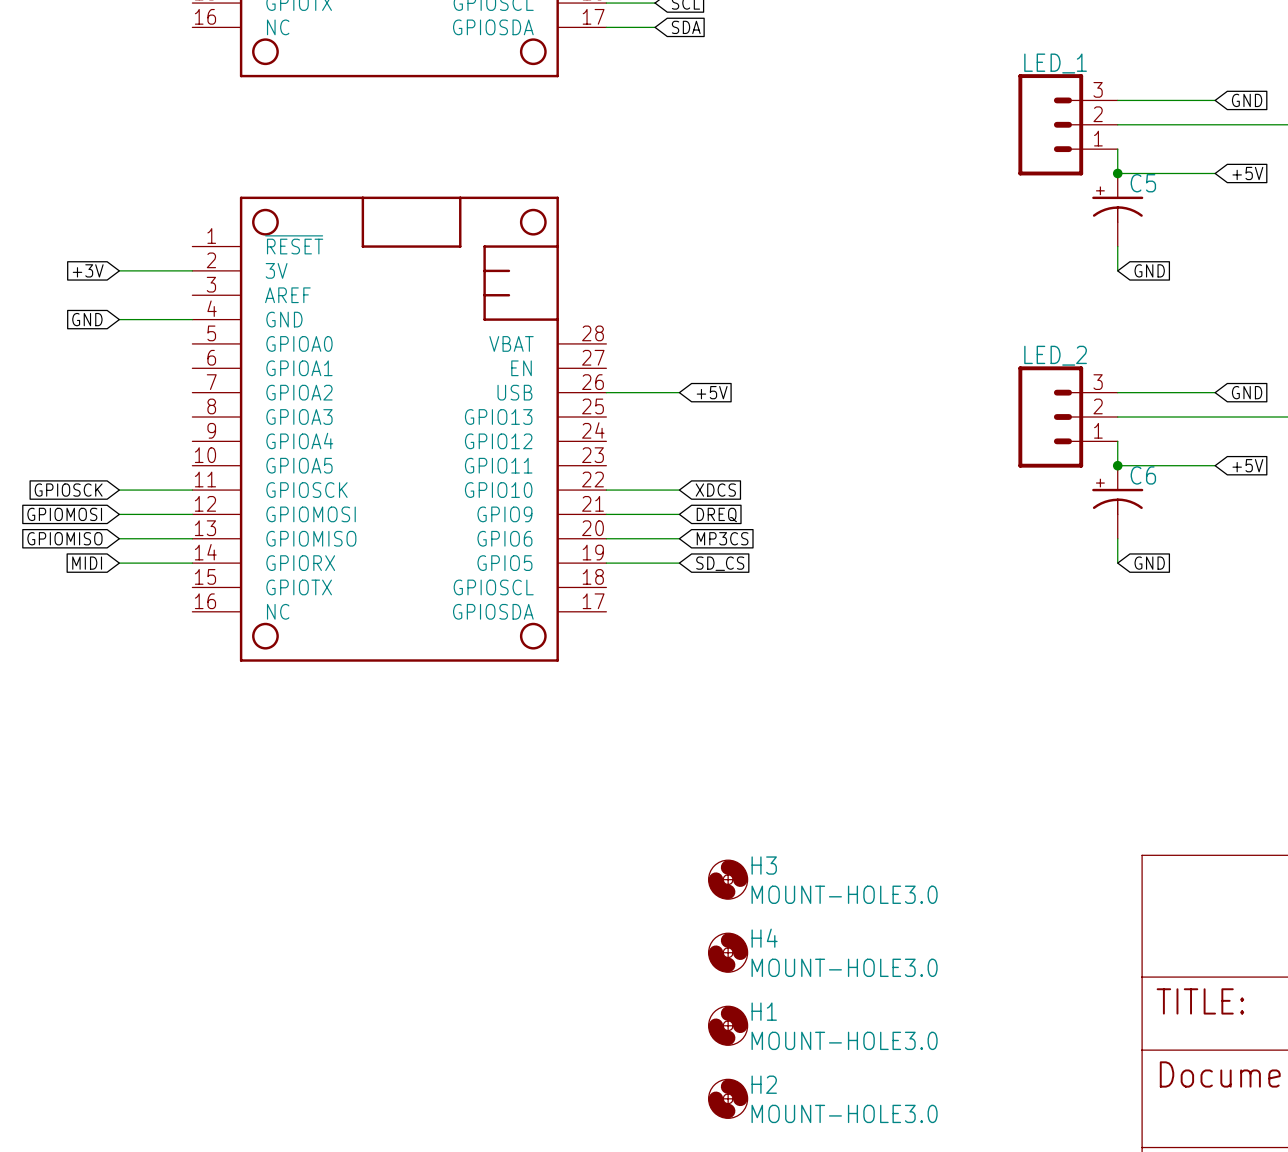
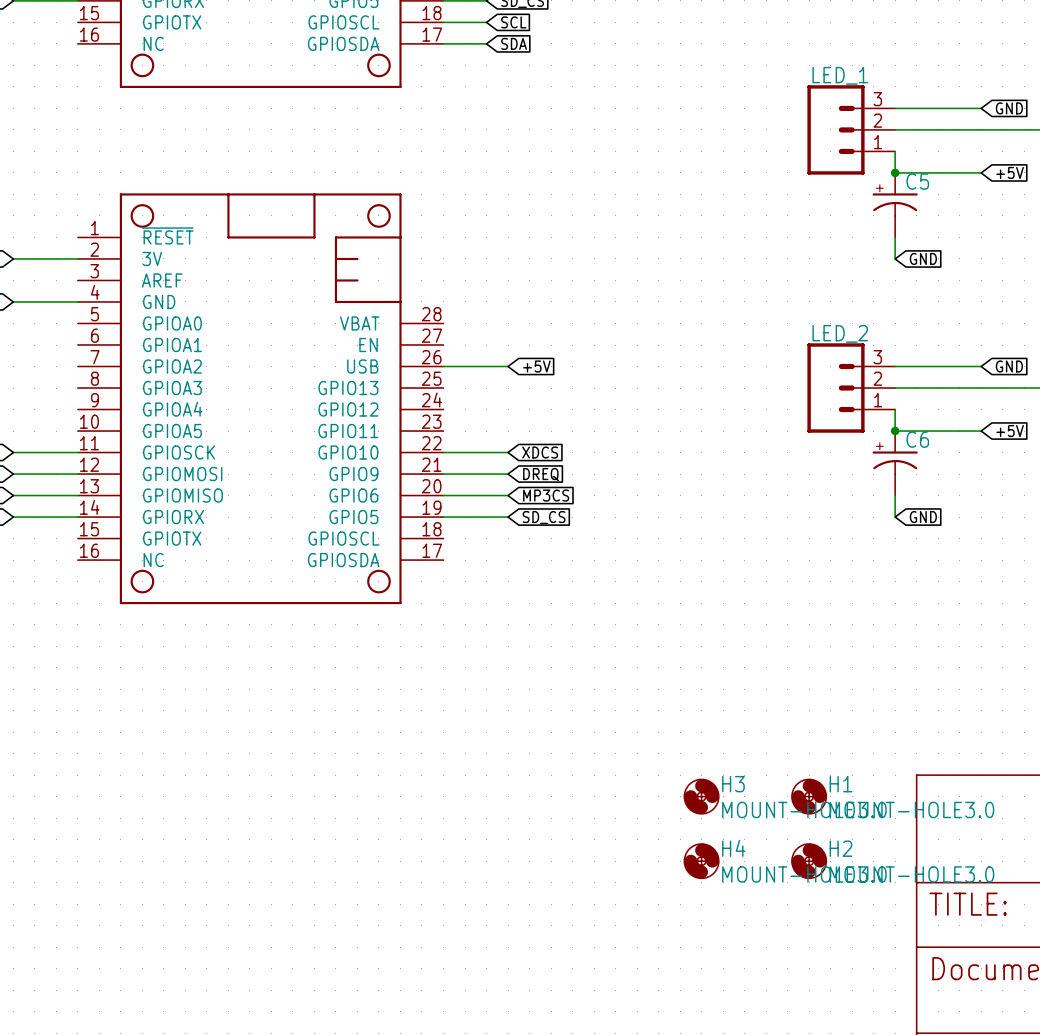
H3 position: (728, 879) -> (701, 796)
H4 position: (728, 952) -> (701, 861)
H1 position: (728, 1025) -> (809, 796)
H2 position: (728, 1098) -> (809, 861)

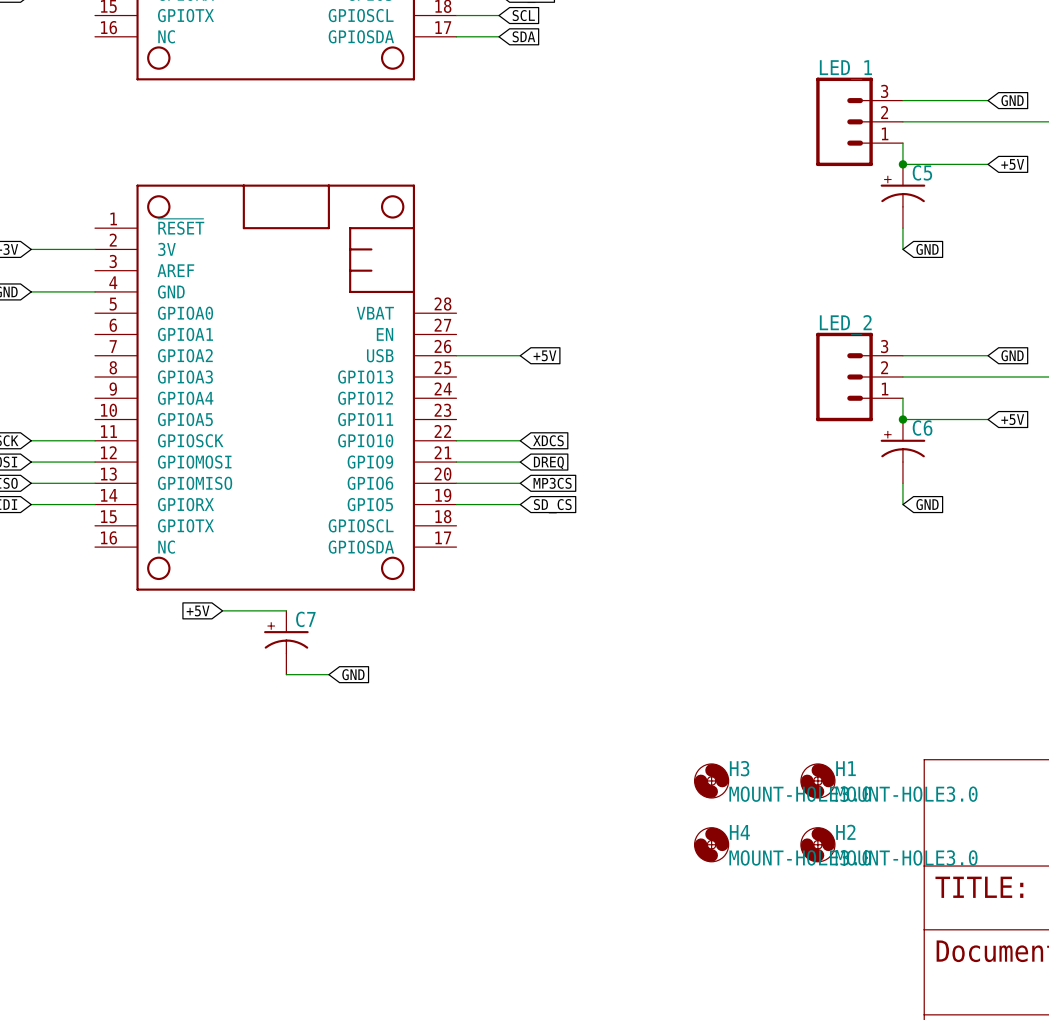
global label: none -> +5V (198, 610)
wire: none -> (222, 610) (286, 610)
C7: none -> (286, 642)
wire: none -> (286, 674) (328, 674)
global label: none -> GND (353, 674)

